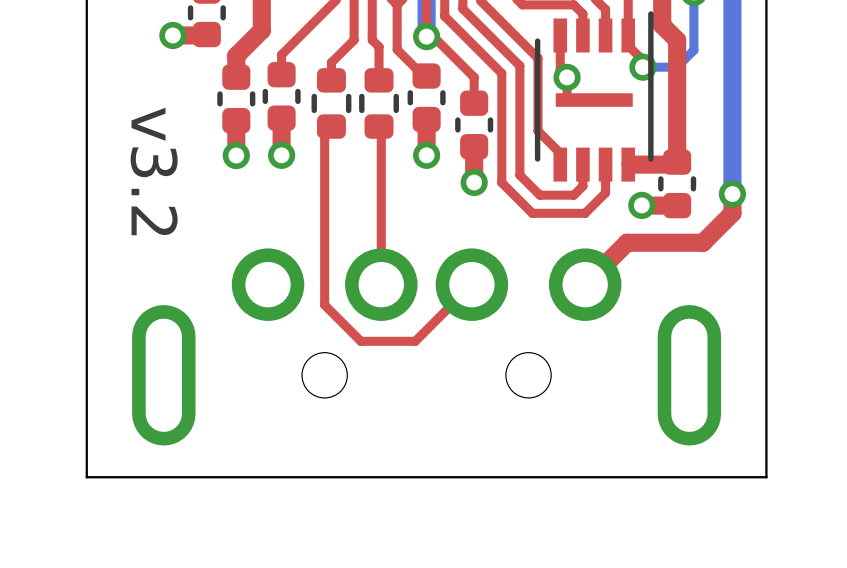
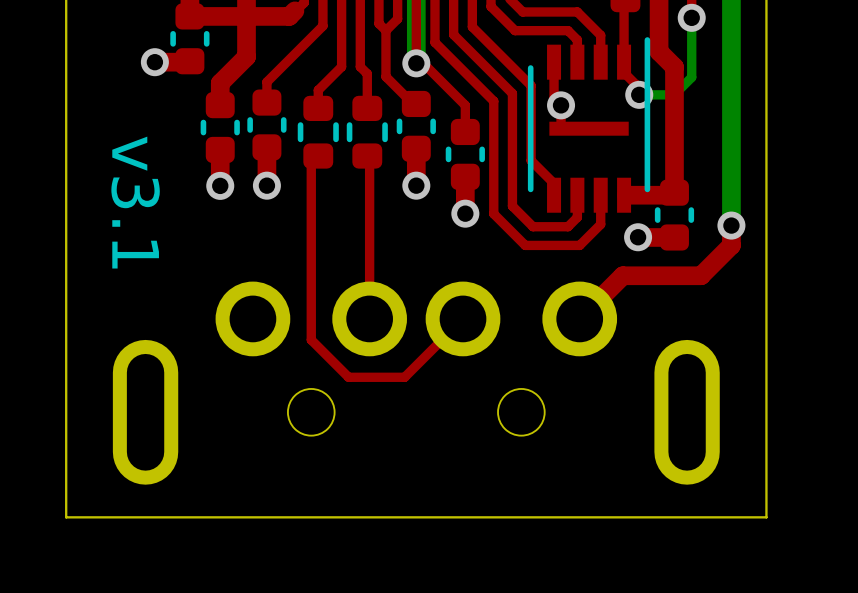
text: v3.2 (154, 171) -> v3.1 (135, 202)

